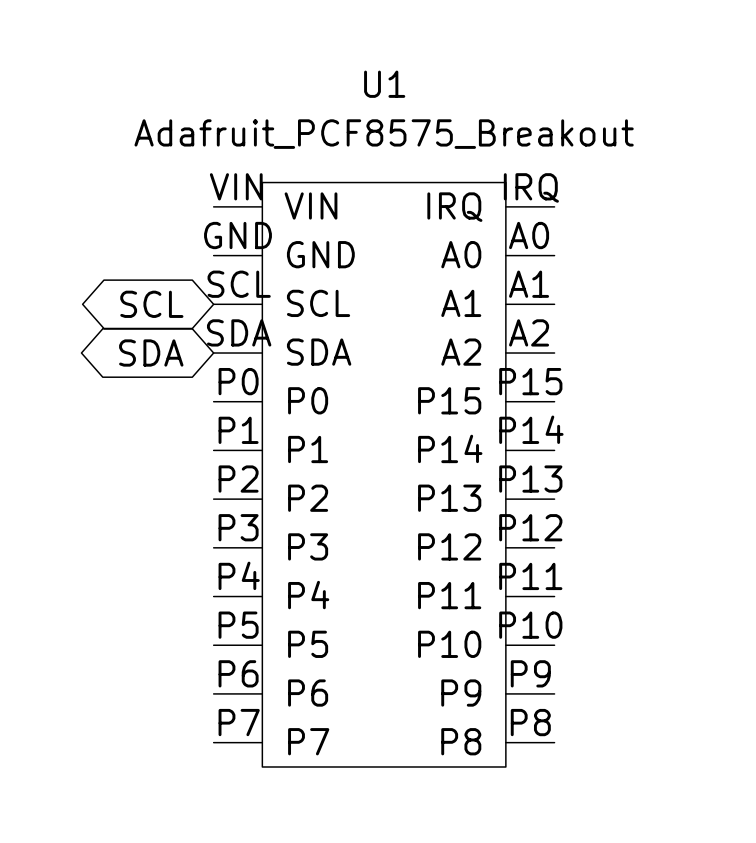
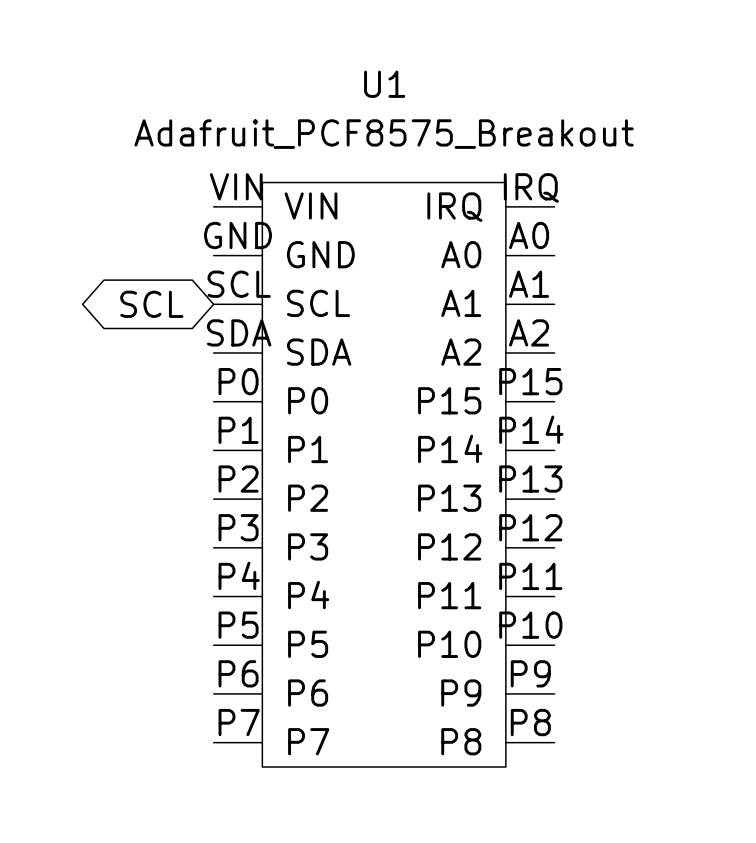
global label: SDA (151, 353) -> none

